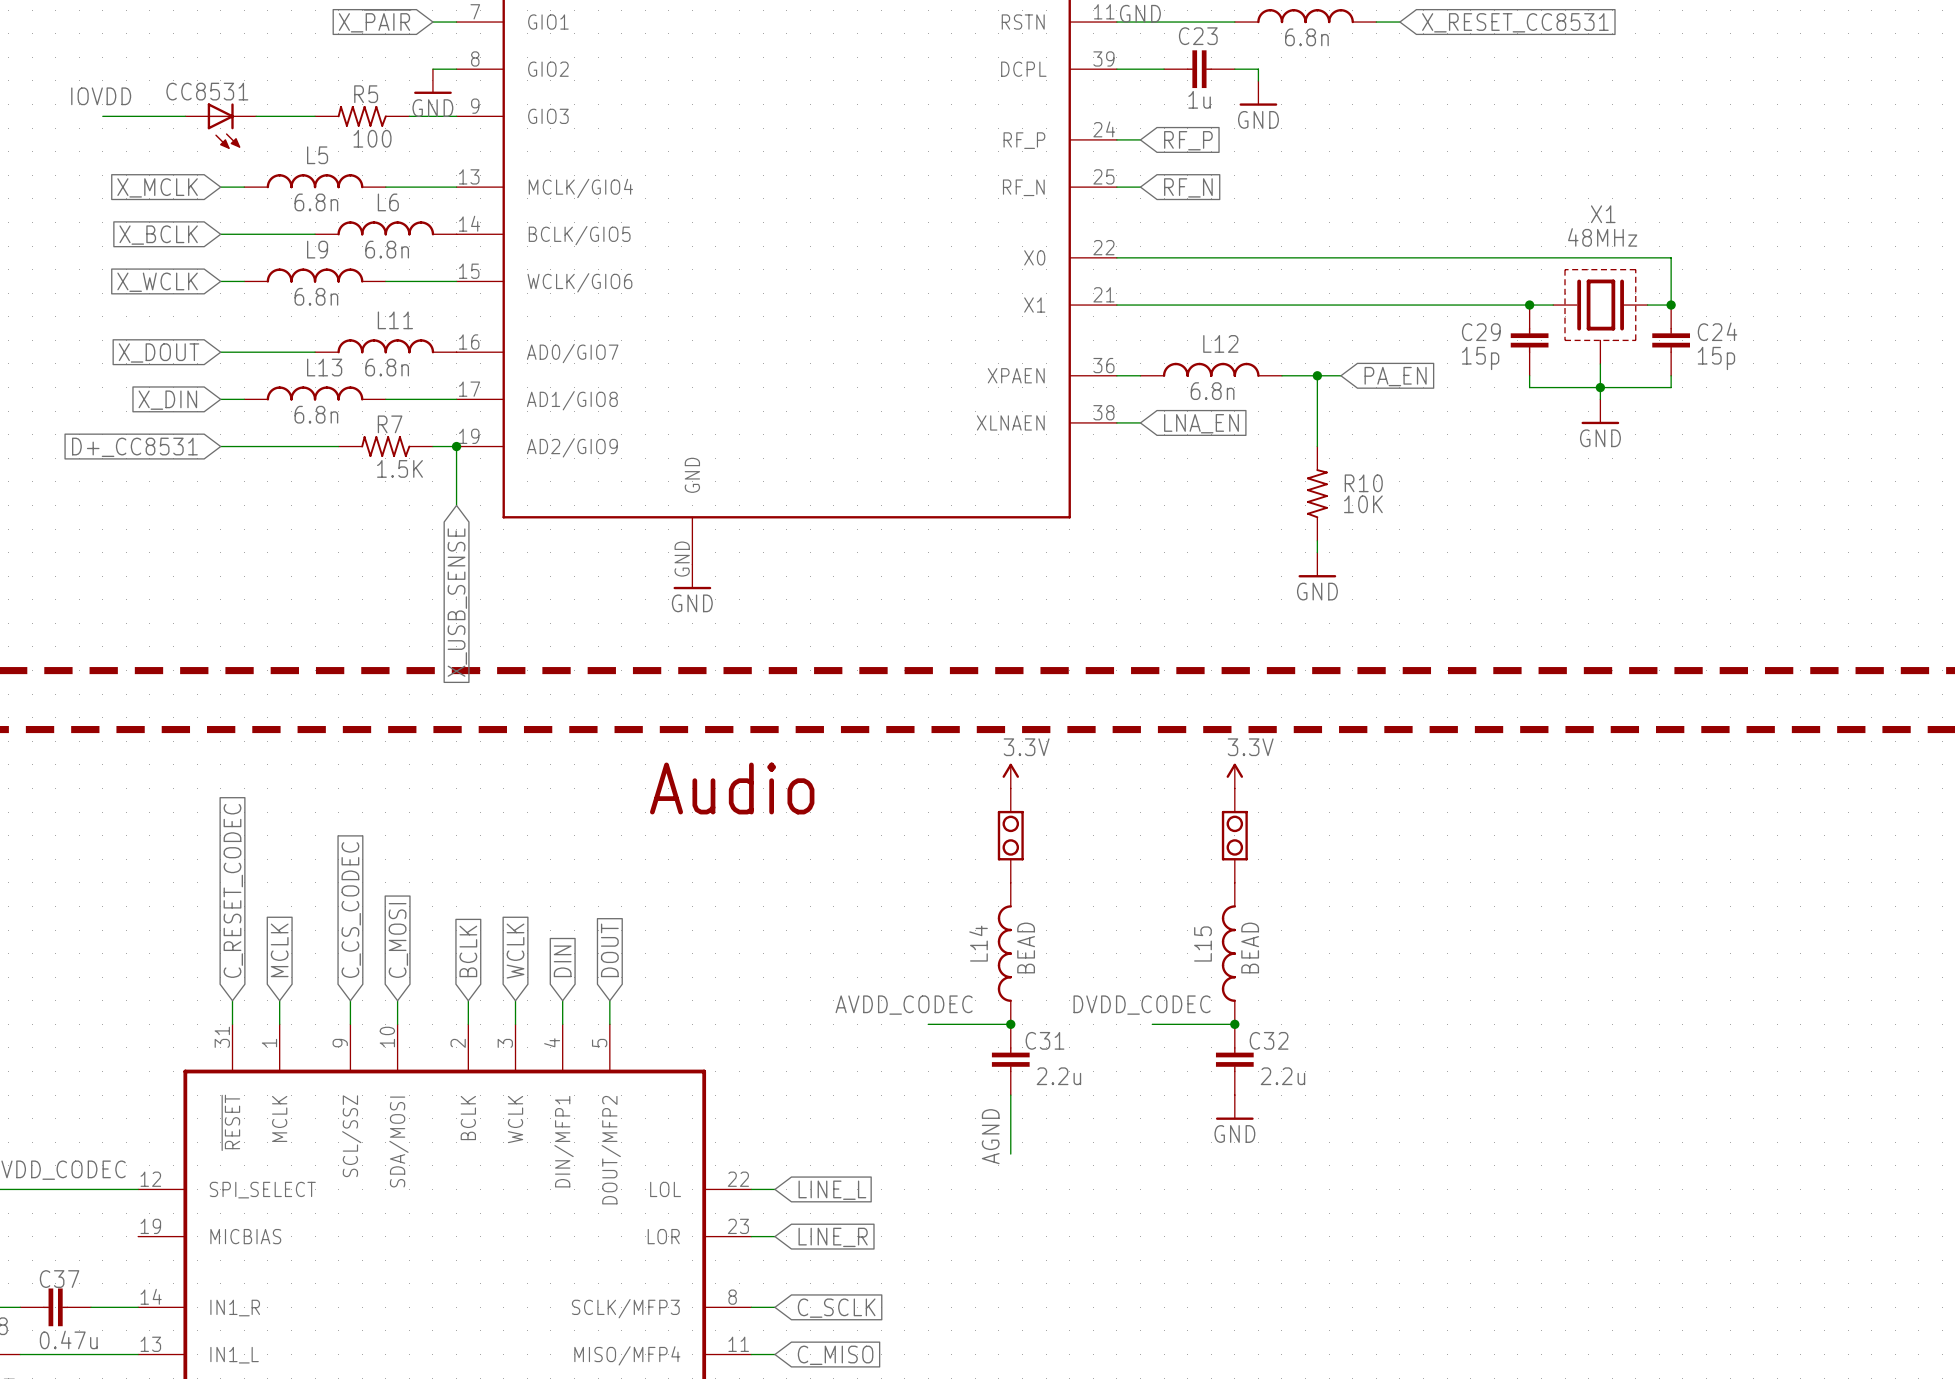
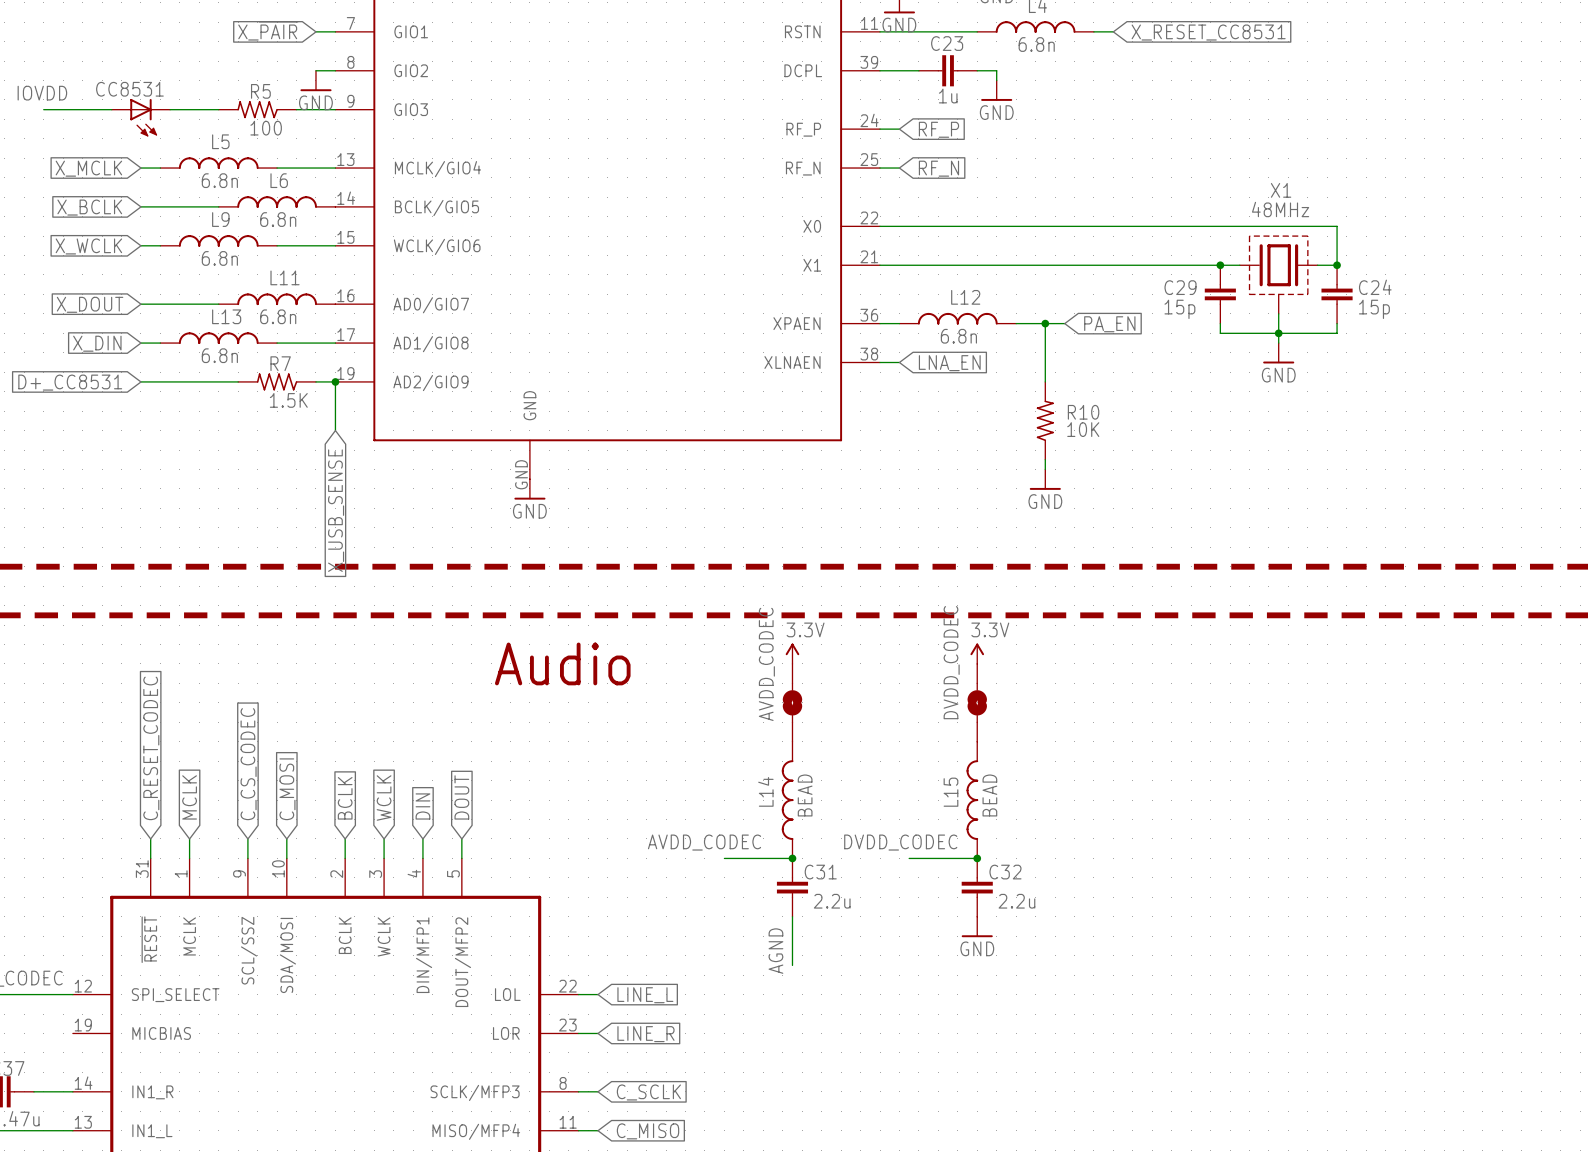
part: (1010, 835) -> none
AVDD_CODEC: none -> (792, 702)
part: (1234, 835) -> none
DVDD_CODEC: none -> (977, 702)

